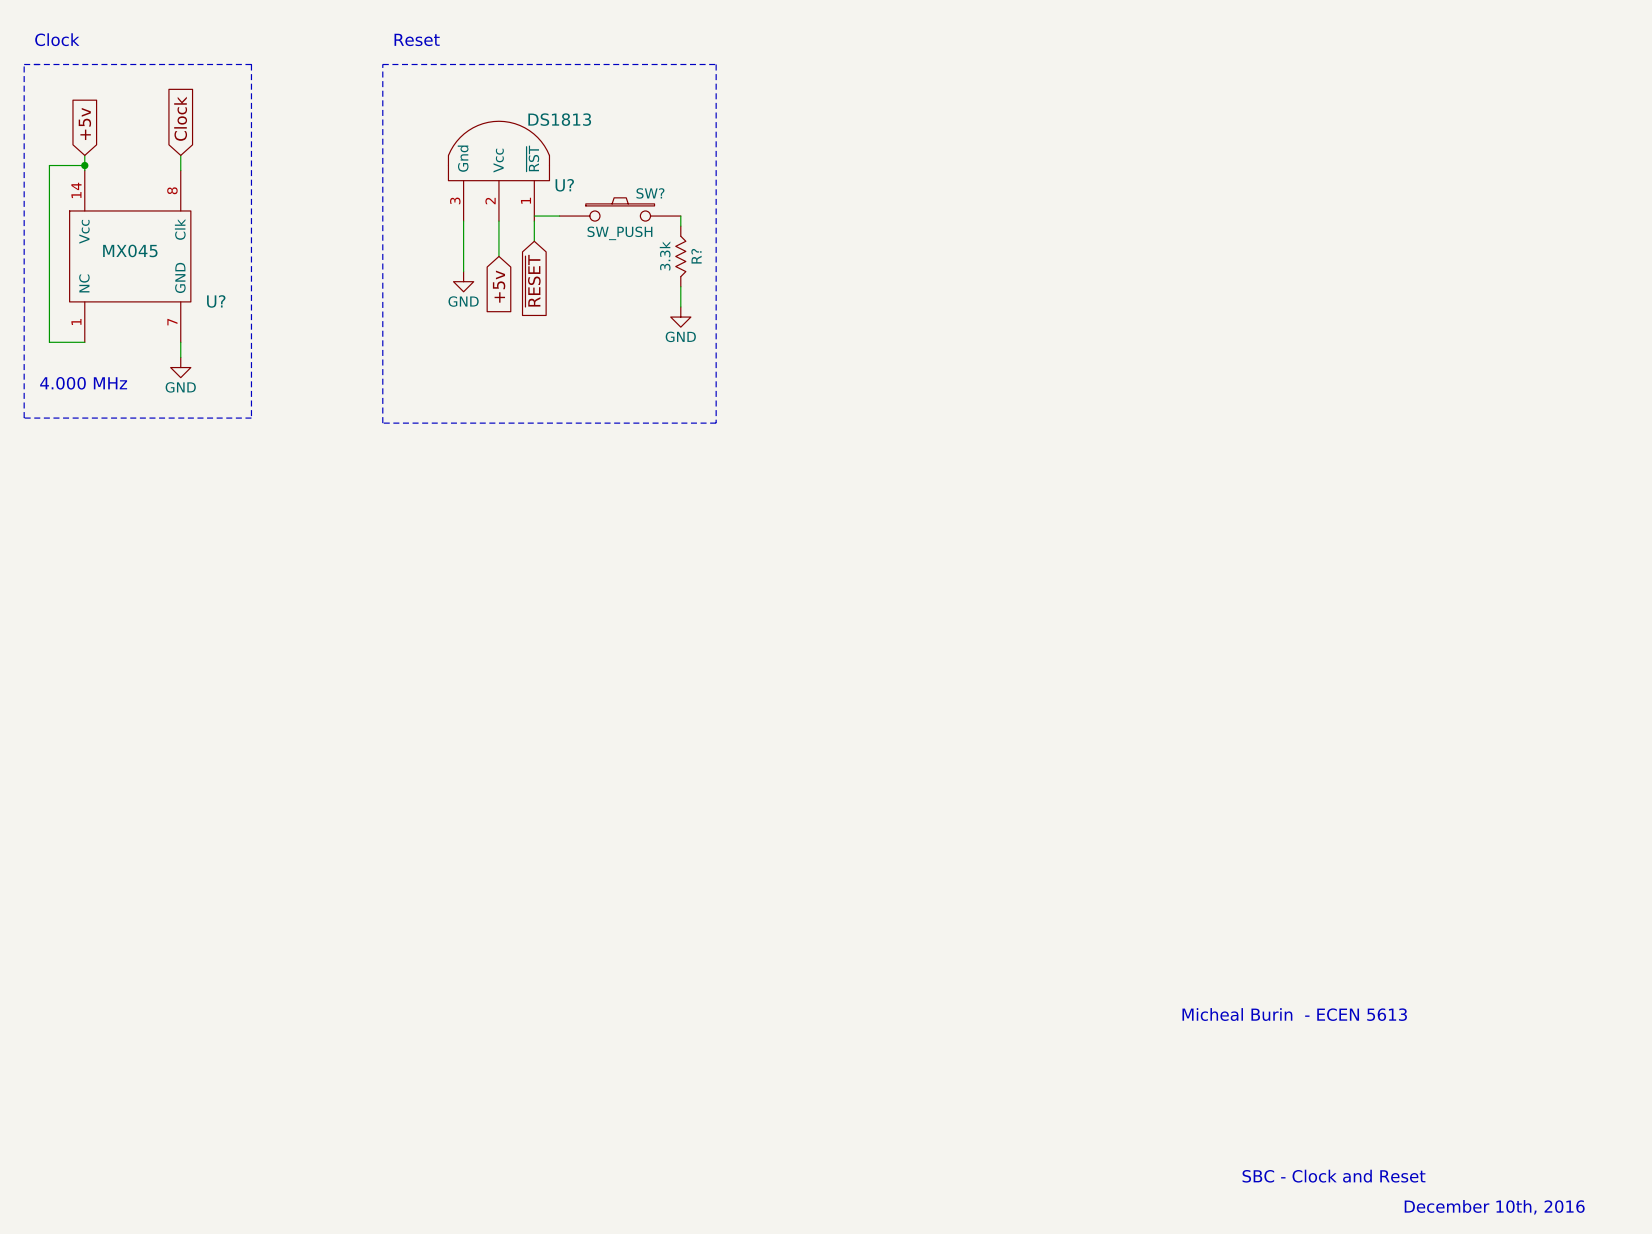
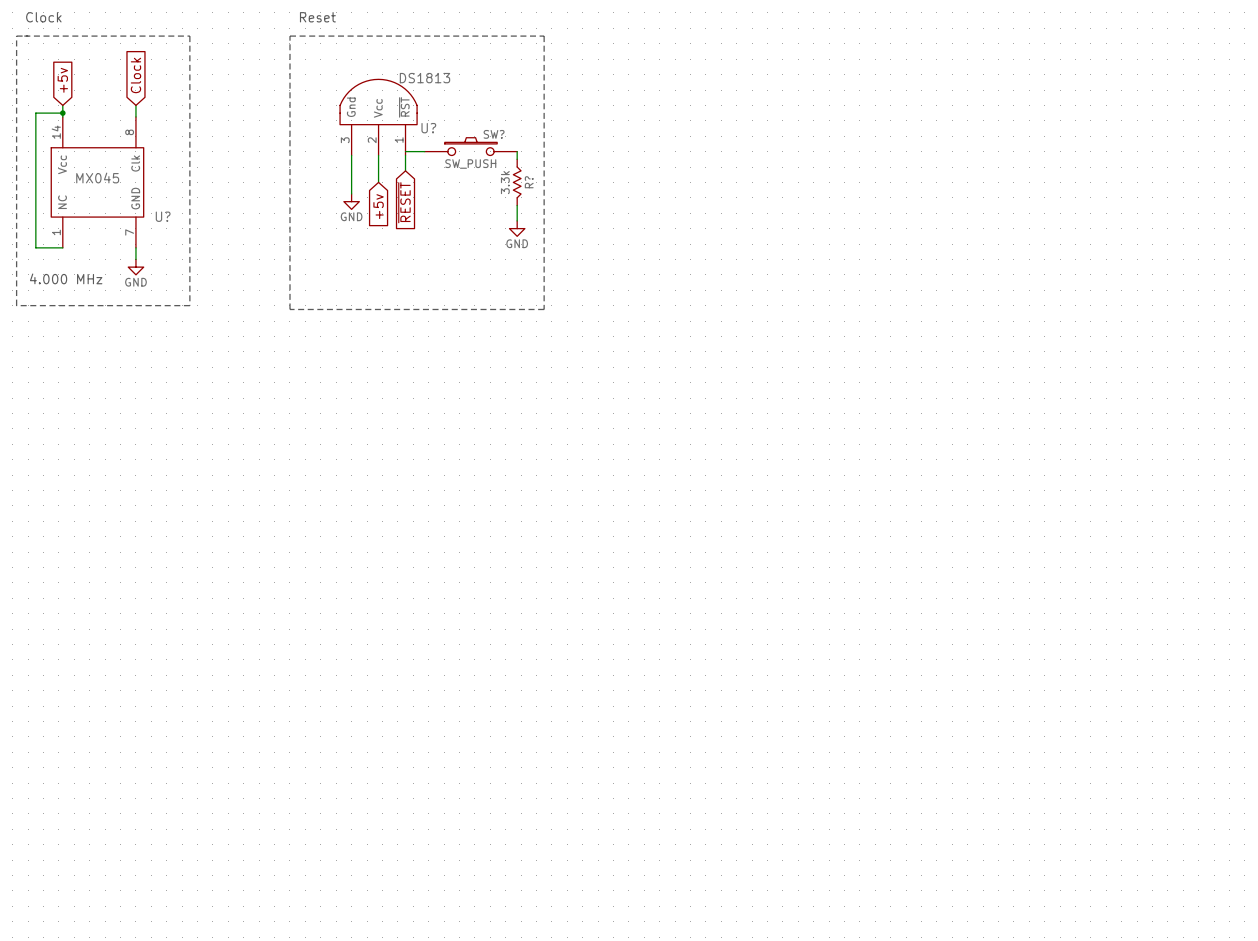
text: Micheal Burin - ECEN 5613 (1294, 1014) -> none
text: SBC - Clock and Reset (1333, 1176) -> none
text: December 10th, 2016 (1494, 1207) -> none

